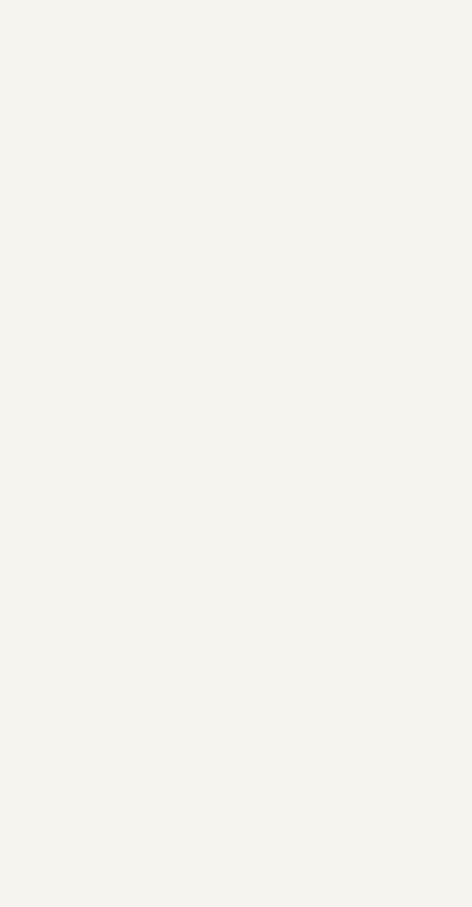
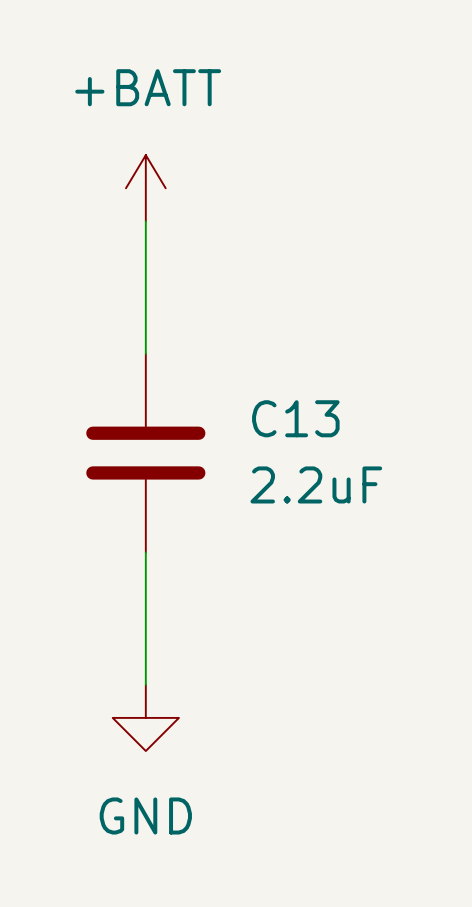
power symbol: none -> +BATT (145, 188)
wire: none -> (145, 221) (145, 353)
C13: none -> 2.2uF (145, 453)
wire: none -> (145, 552) (145, 684)
power symbol: none -> GND (145, 717)

